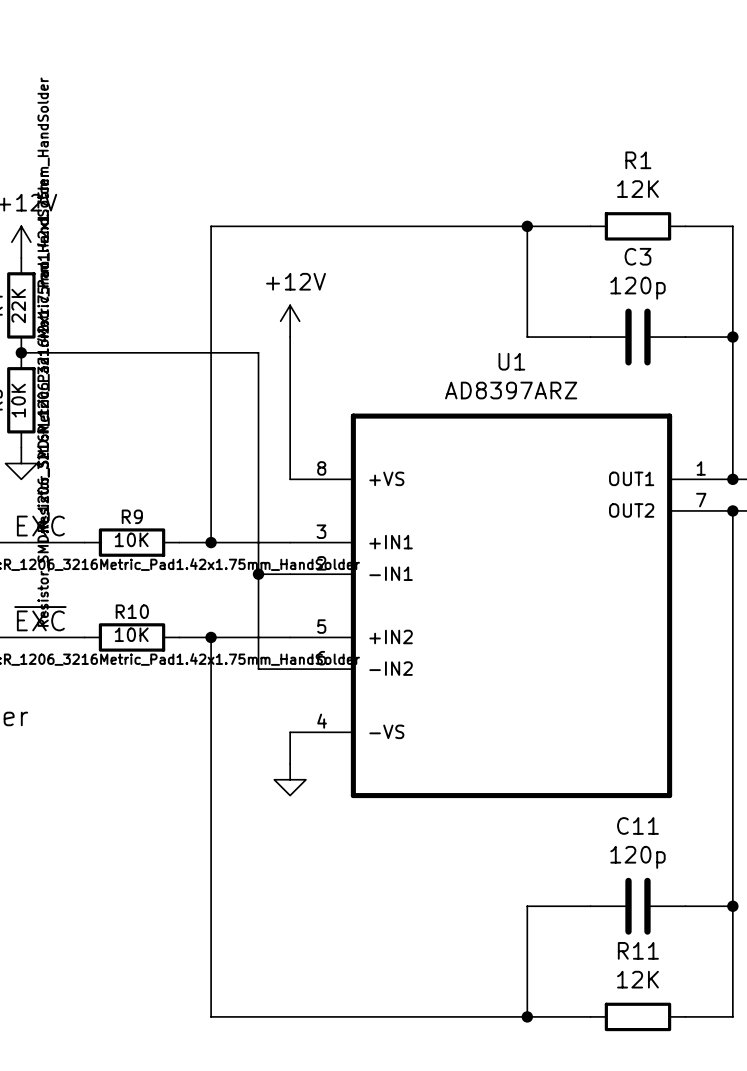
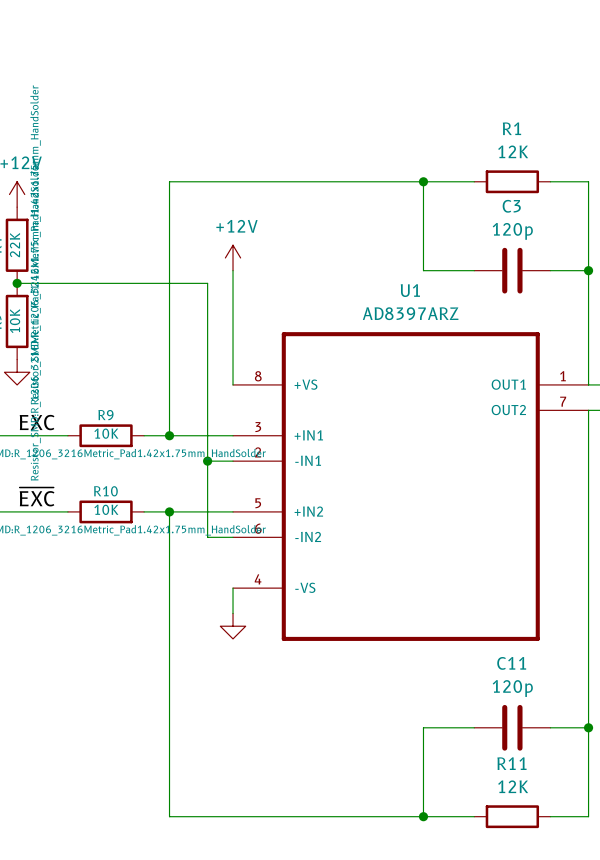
junction: (732, 479) -> none
junction: (732, 510) -> none

